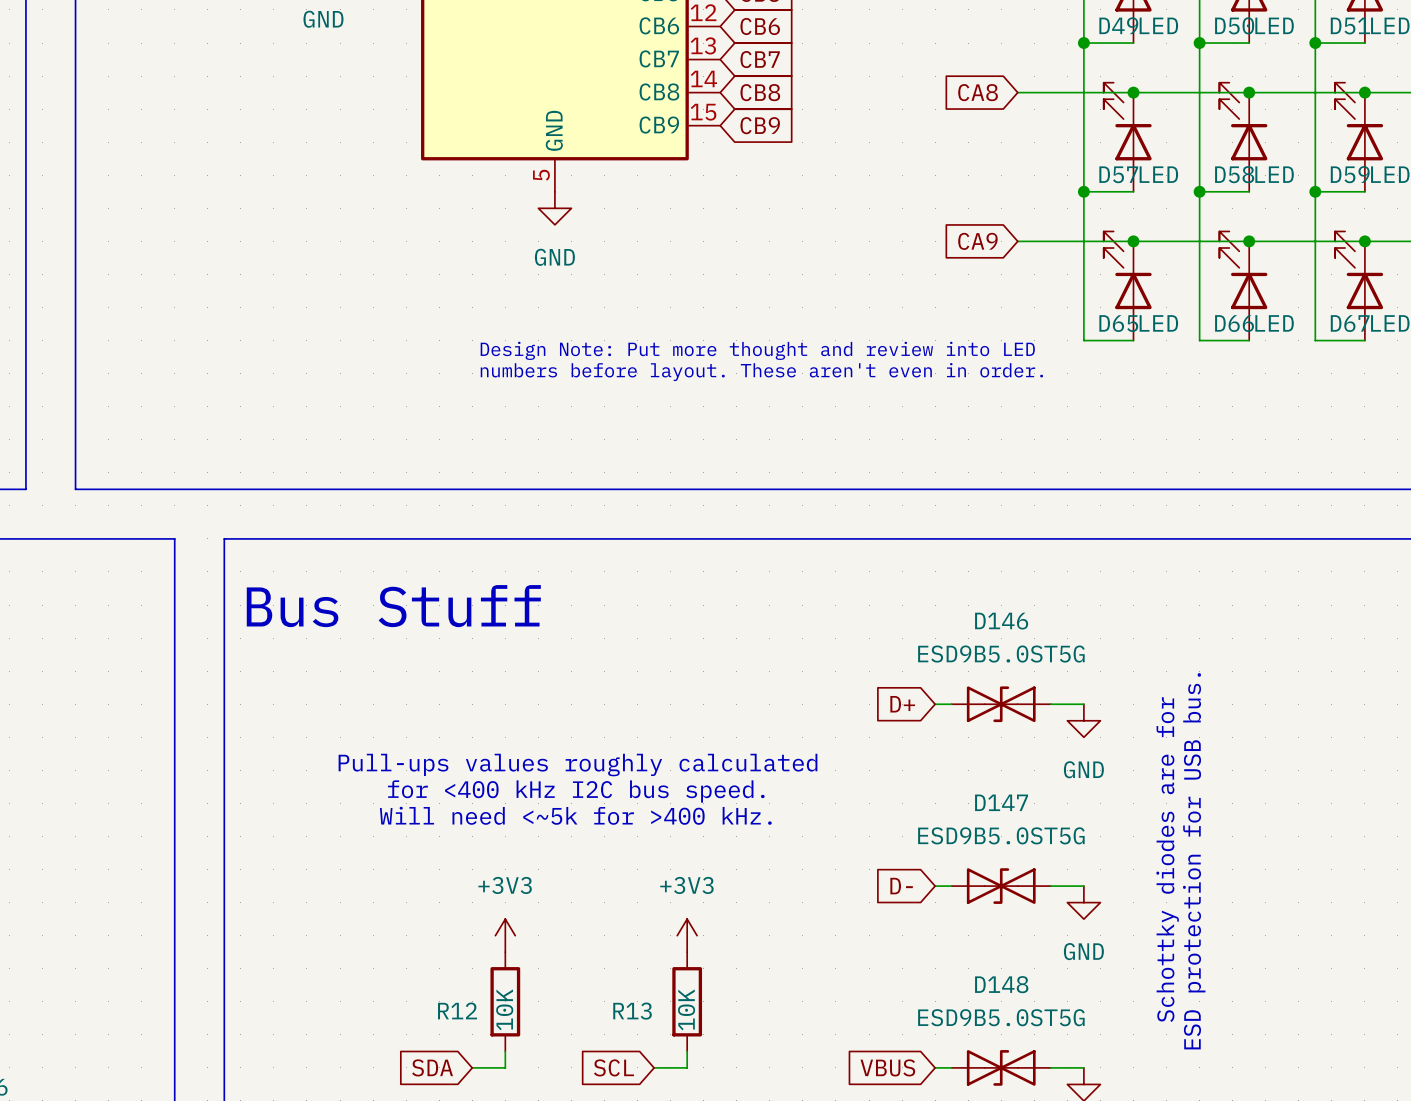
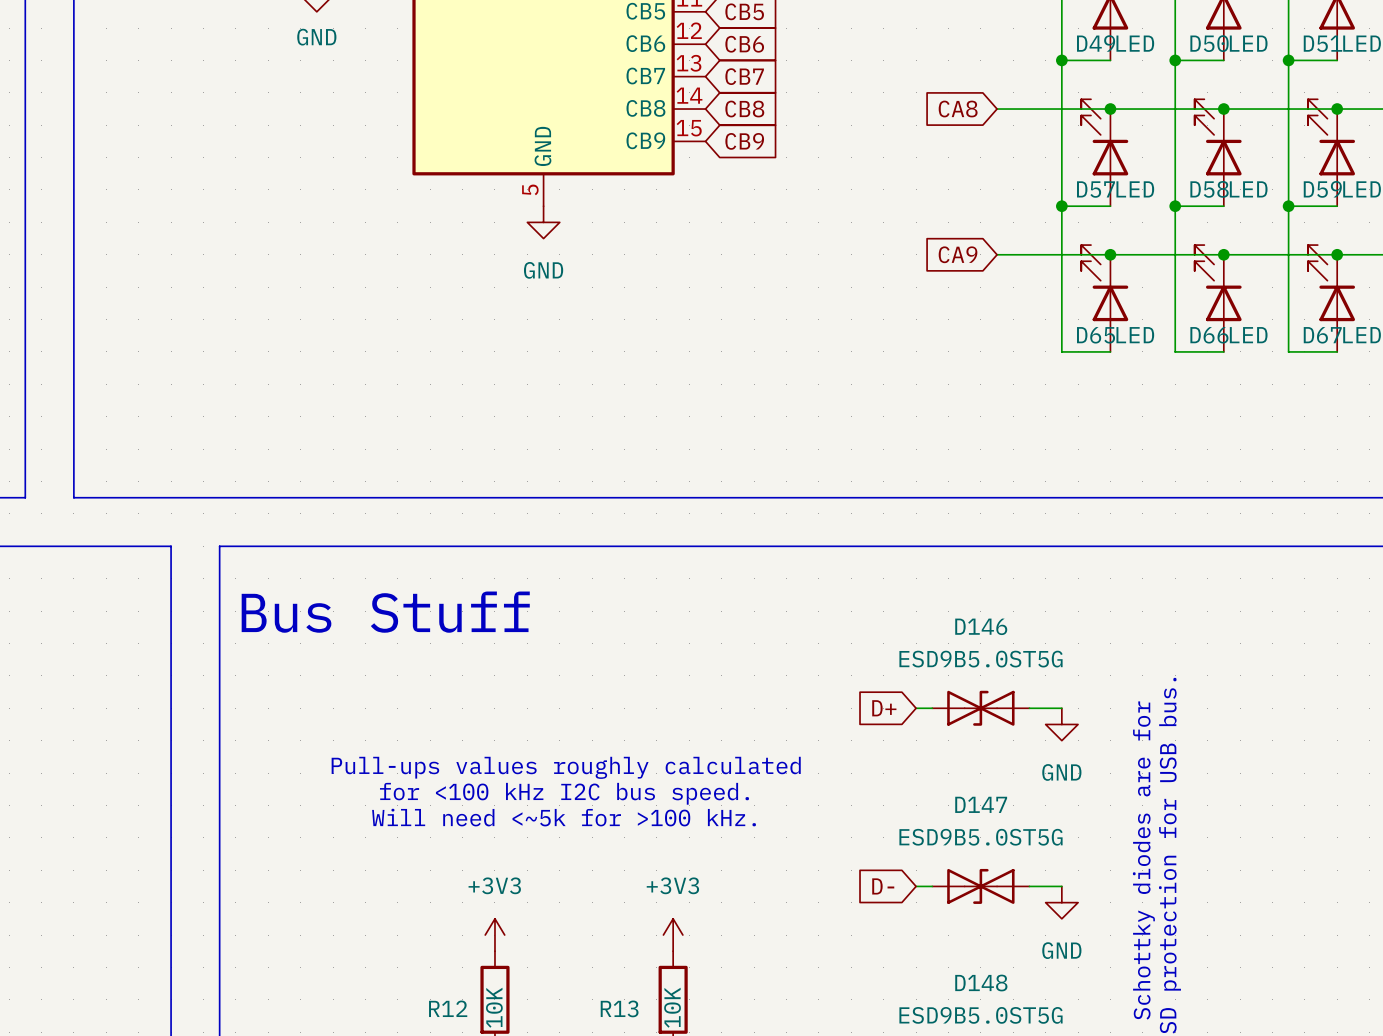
text: Design Note: Put more thought and review into LED (757, 350) -> none
text: numbers before layout. These aren't even in order. (761, 372) -> none
text: for <400 kHz I2C bus speed. (576, 791) -> for <100 kHz I2C bus speed. (564, 793)
text: Will need <~5k for >400 kHz. (575, 815) -> Will need <~5k for >100 kHz. (564, 817)

